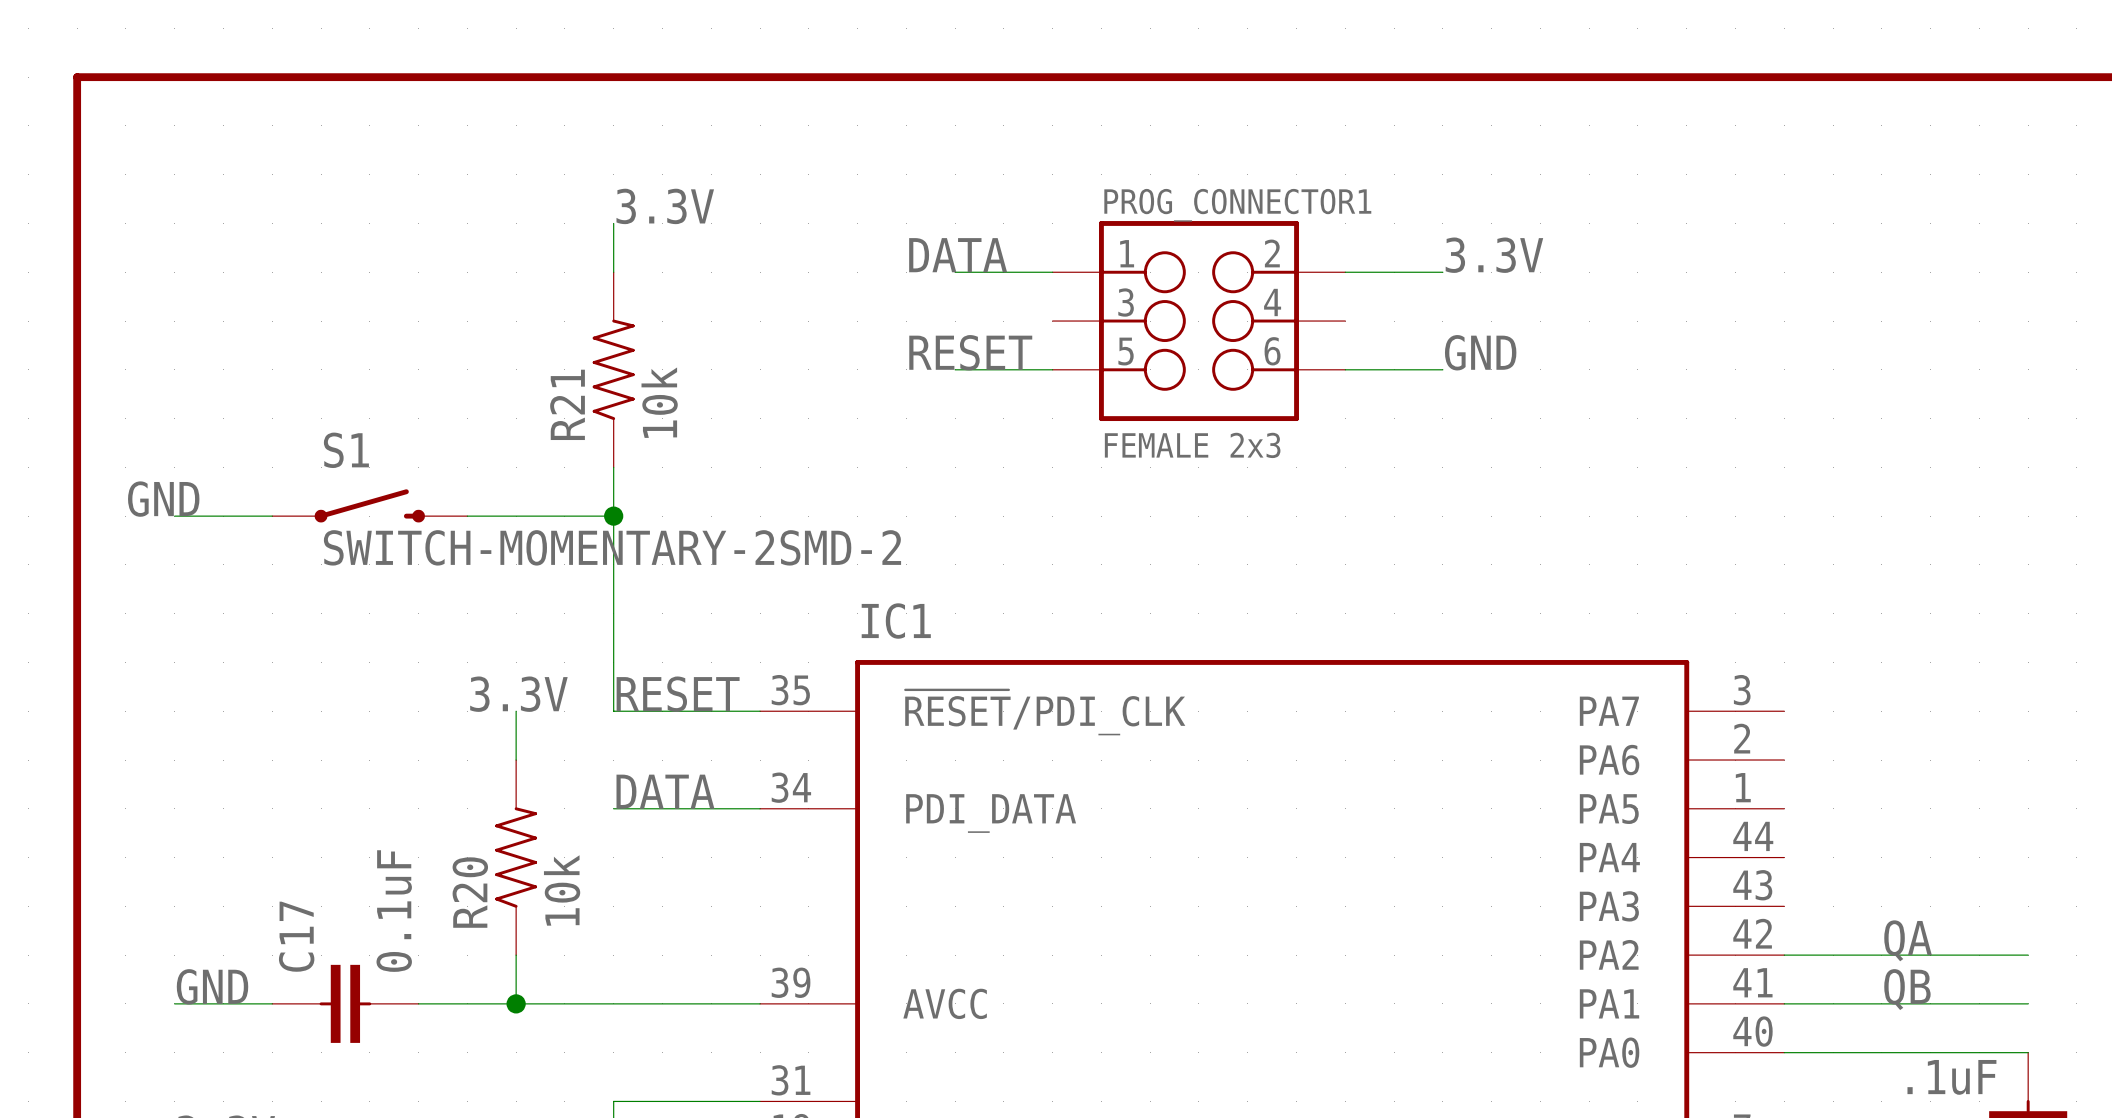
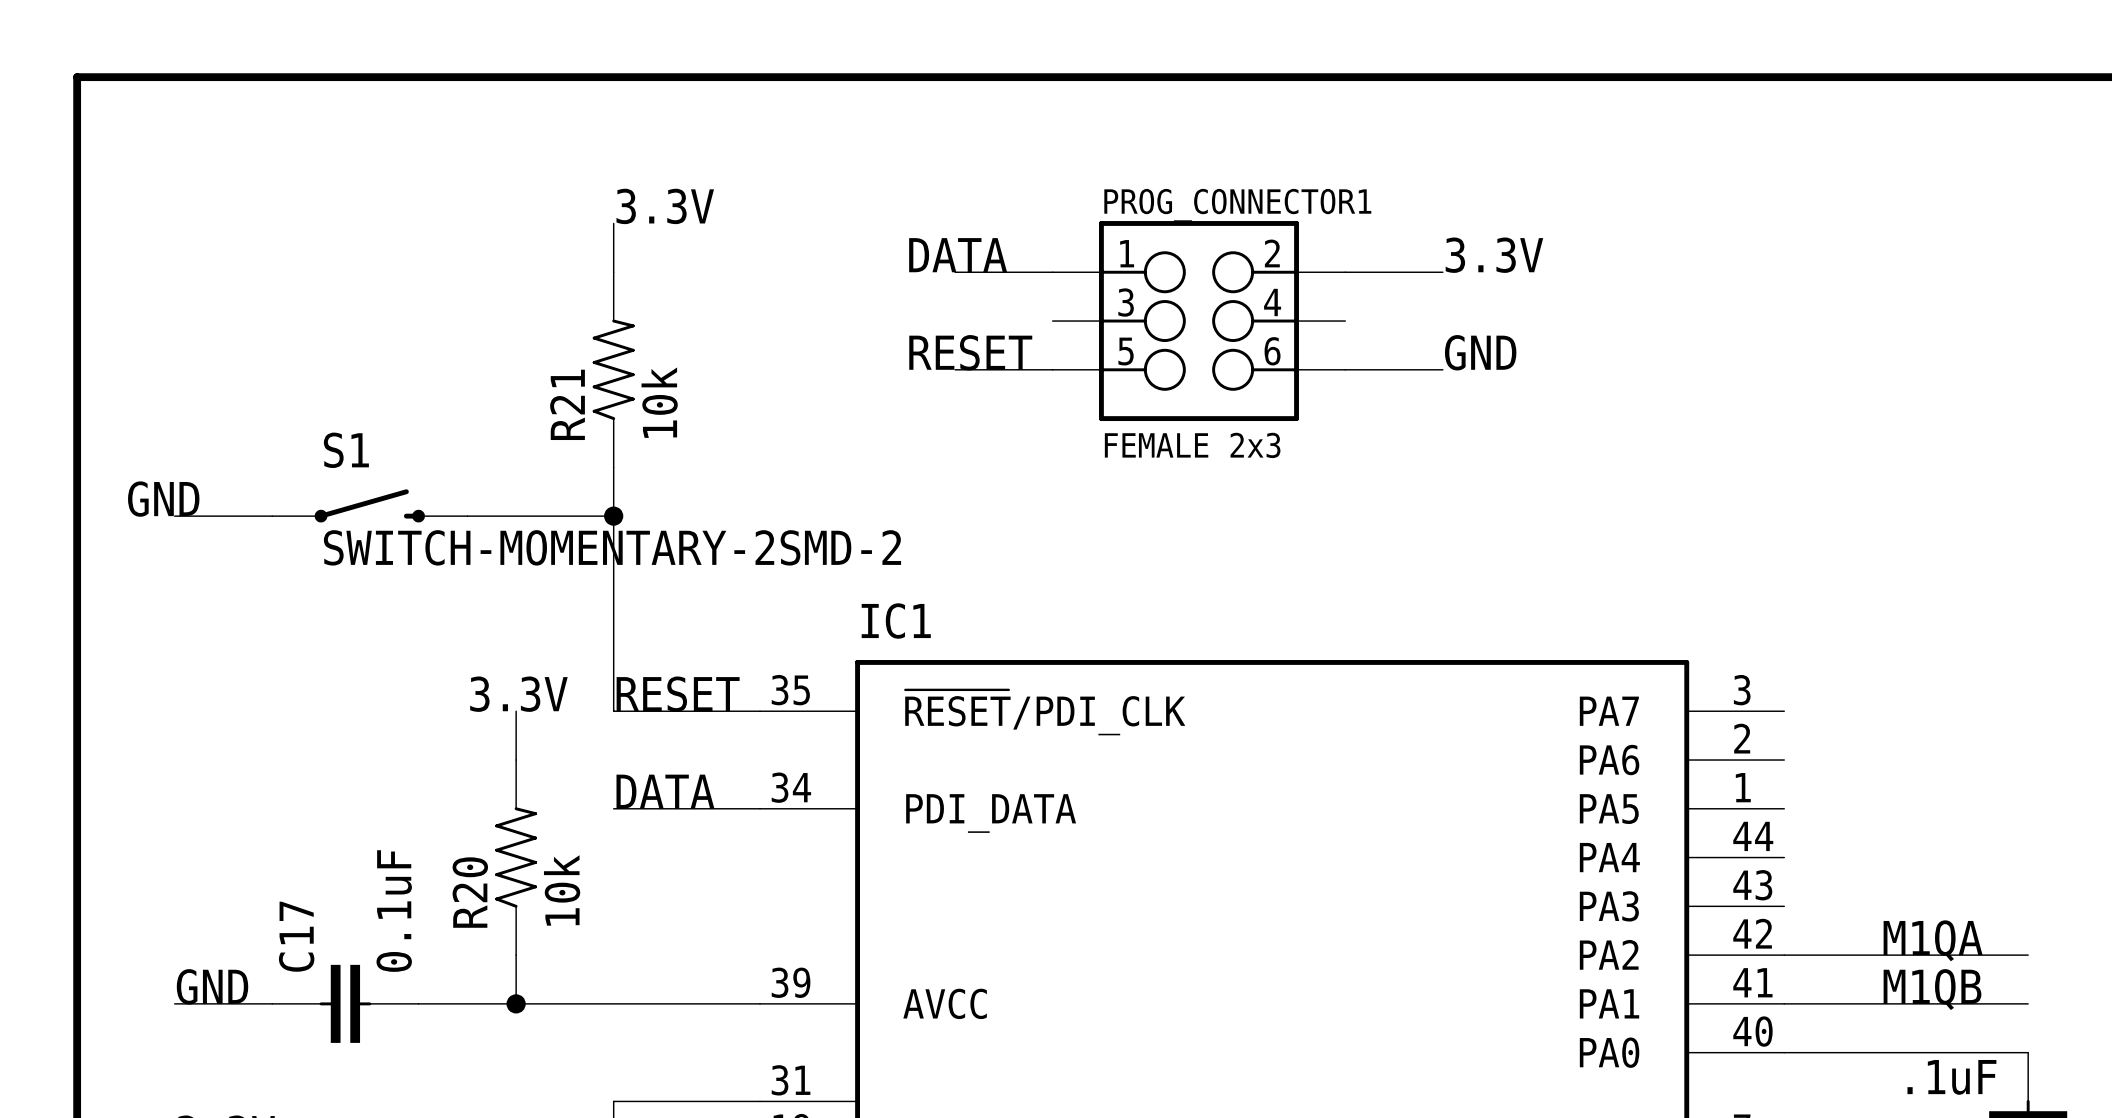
label: QA (1908, 940) -> M1QA (1933, 940)
label: QB (1907, 989) -> M1QB (1932, 989)

